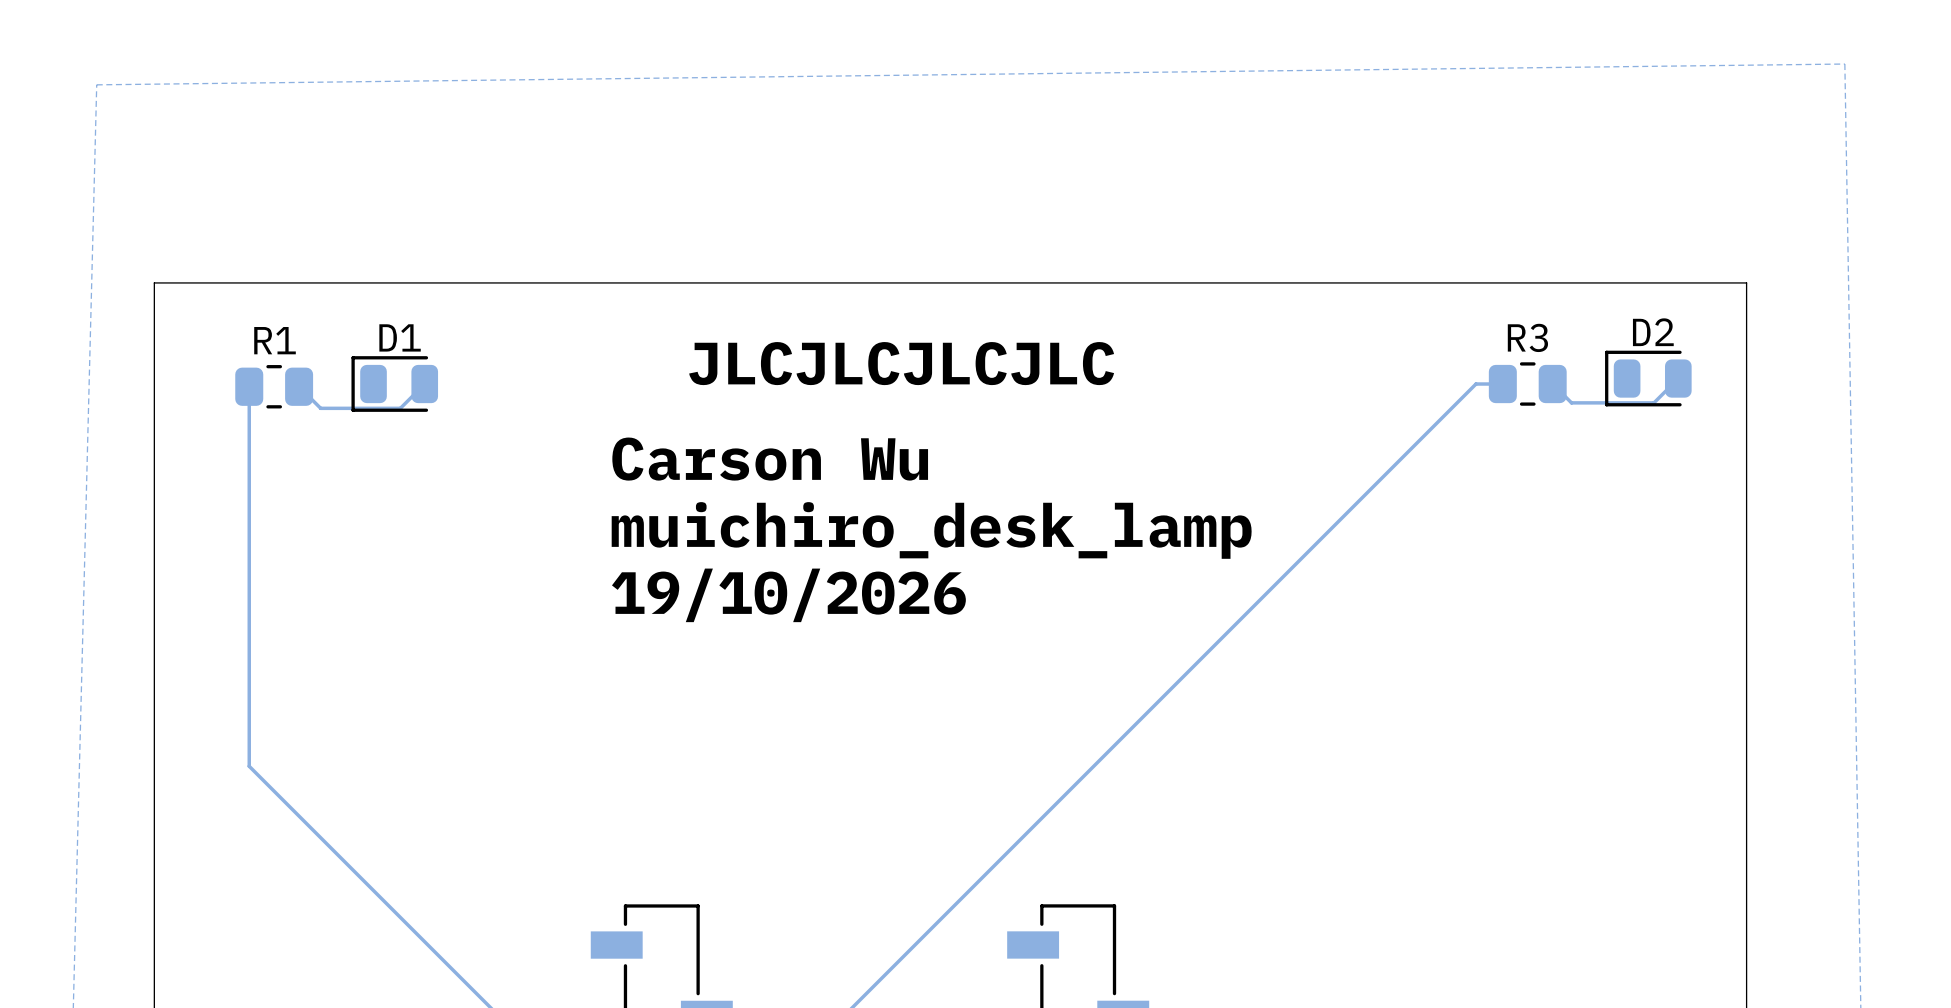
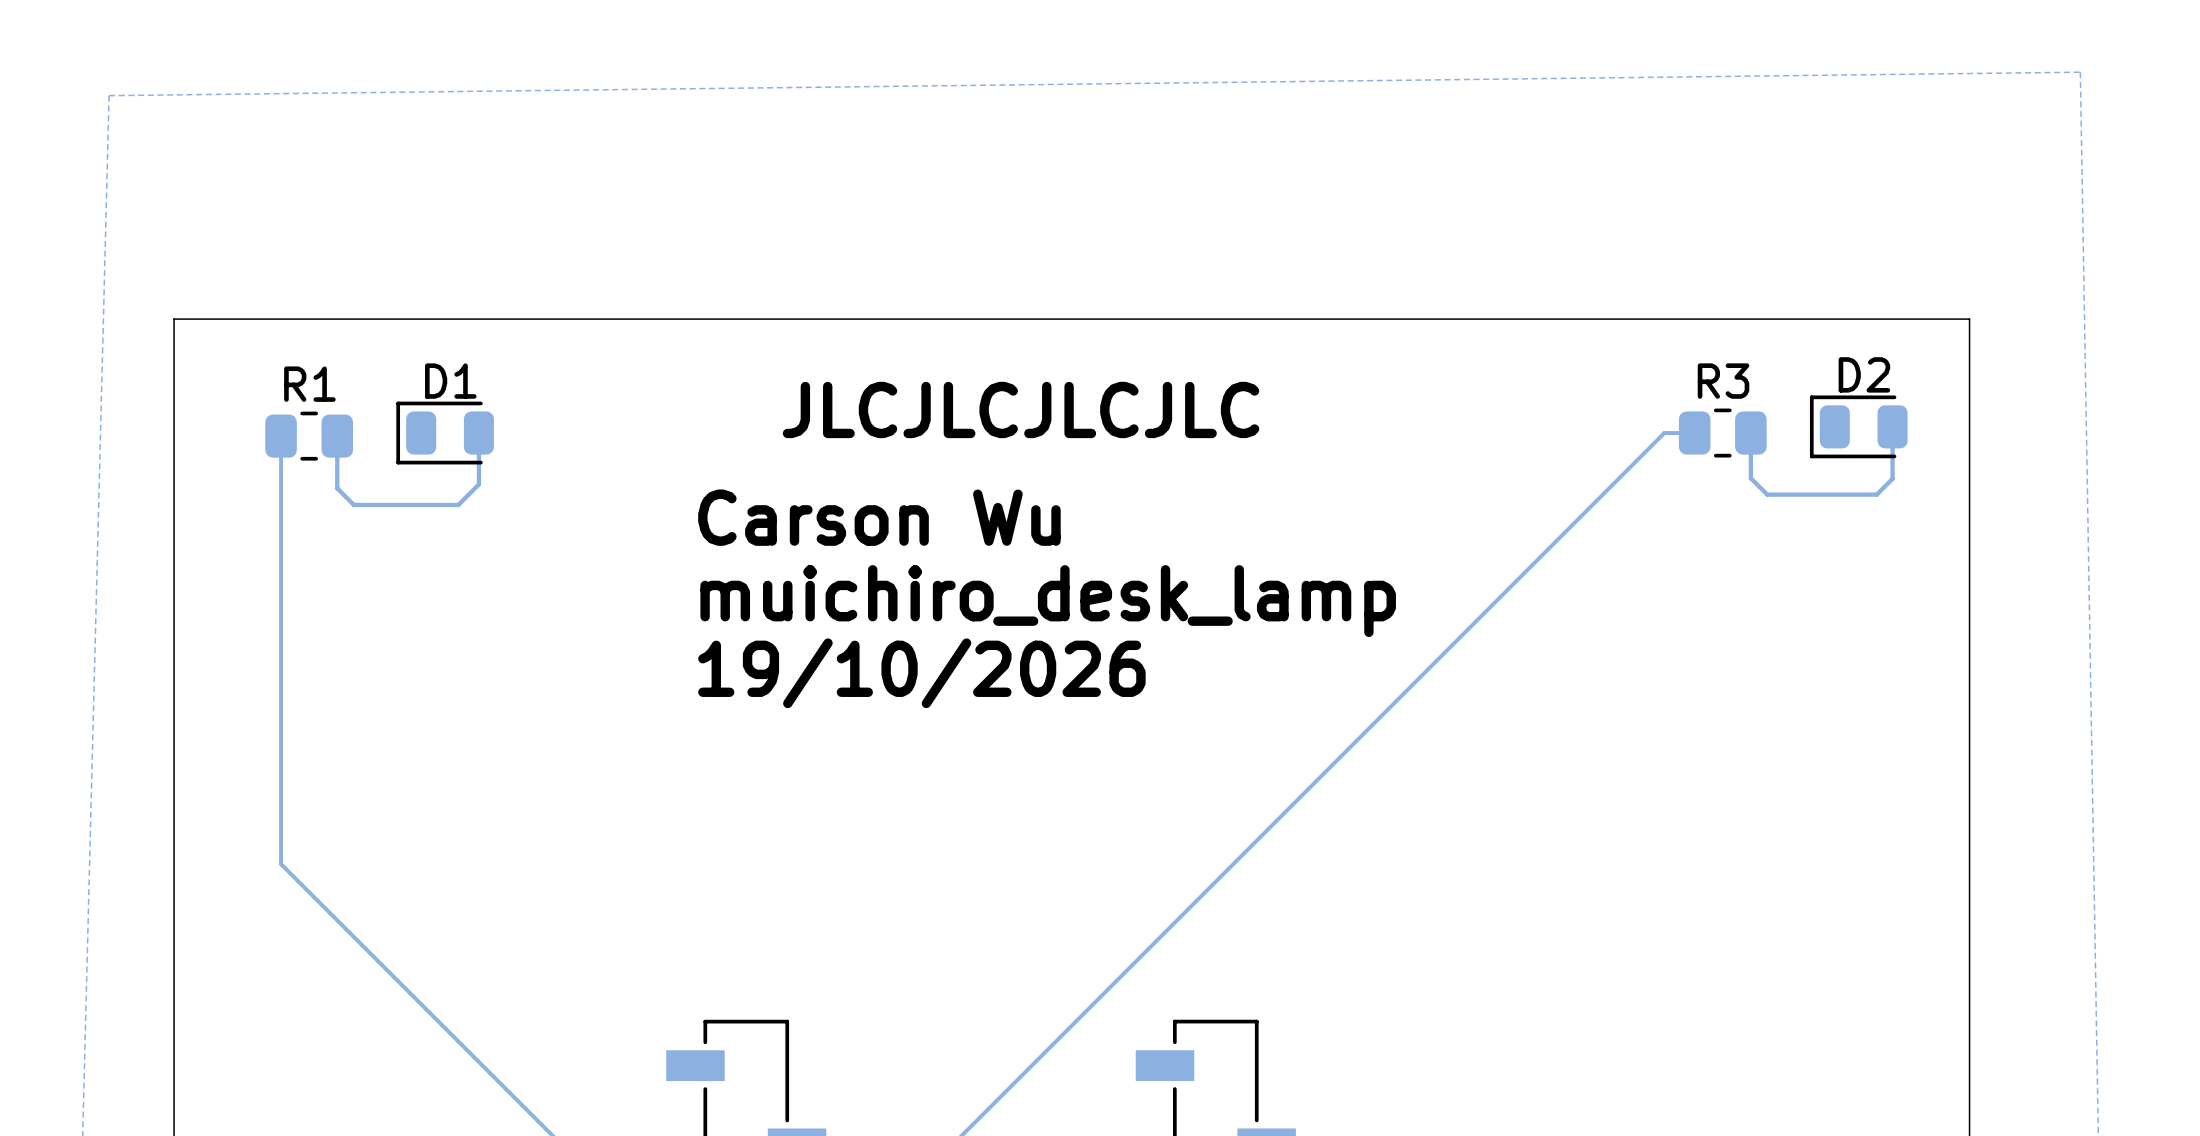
track: (1678, 378) (1653, 402) (1571, 402) (1552, 384) -> (1892, 426) (1892, 478) (1876, 494) (1767, 494) (1750, 478) (1750, 433)
track: (424, 384) (400, 408) (320, 408) (299, 386) -> (478, 433) (478, 484) (458, 504) (353, 504) (337, 488) (337, 436)

